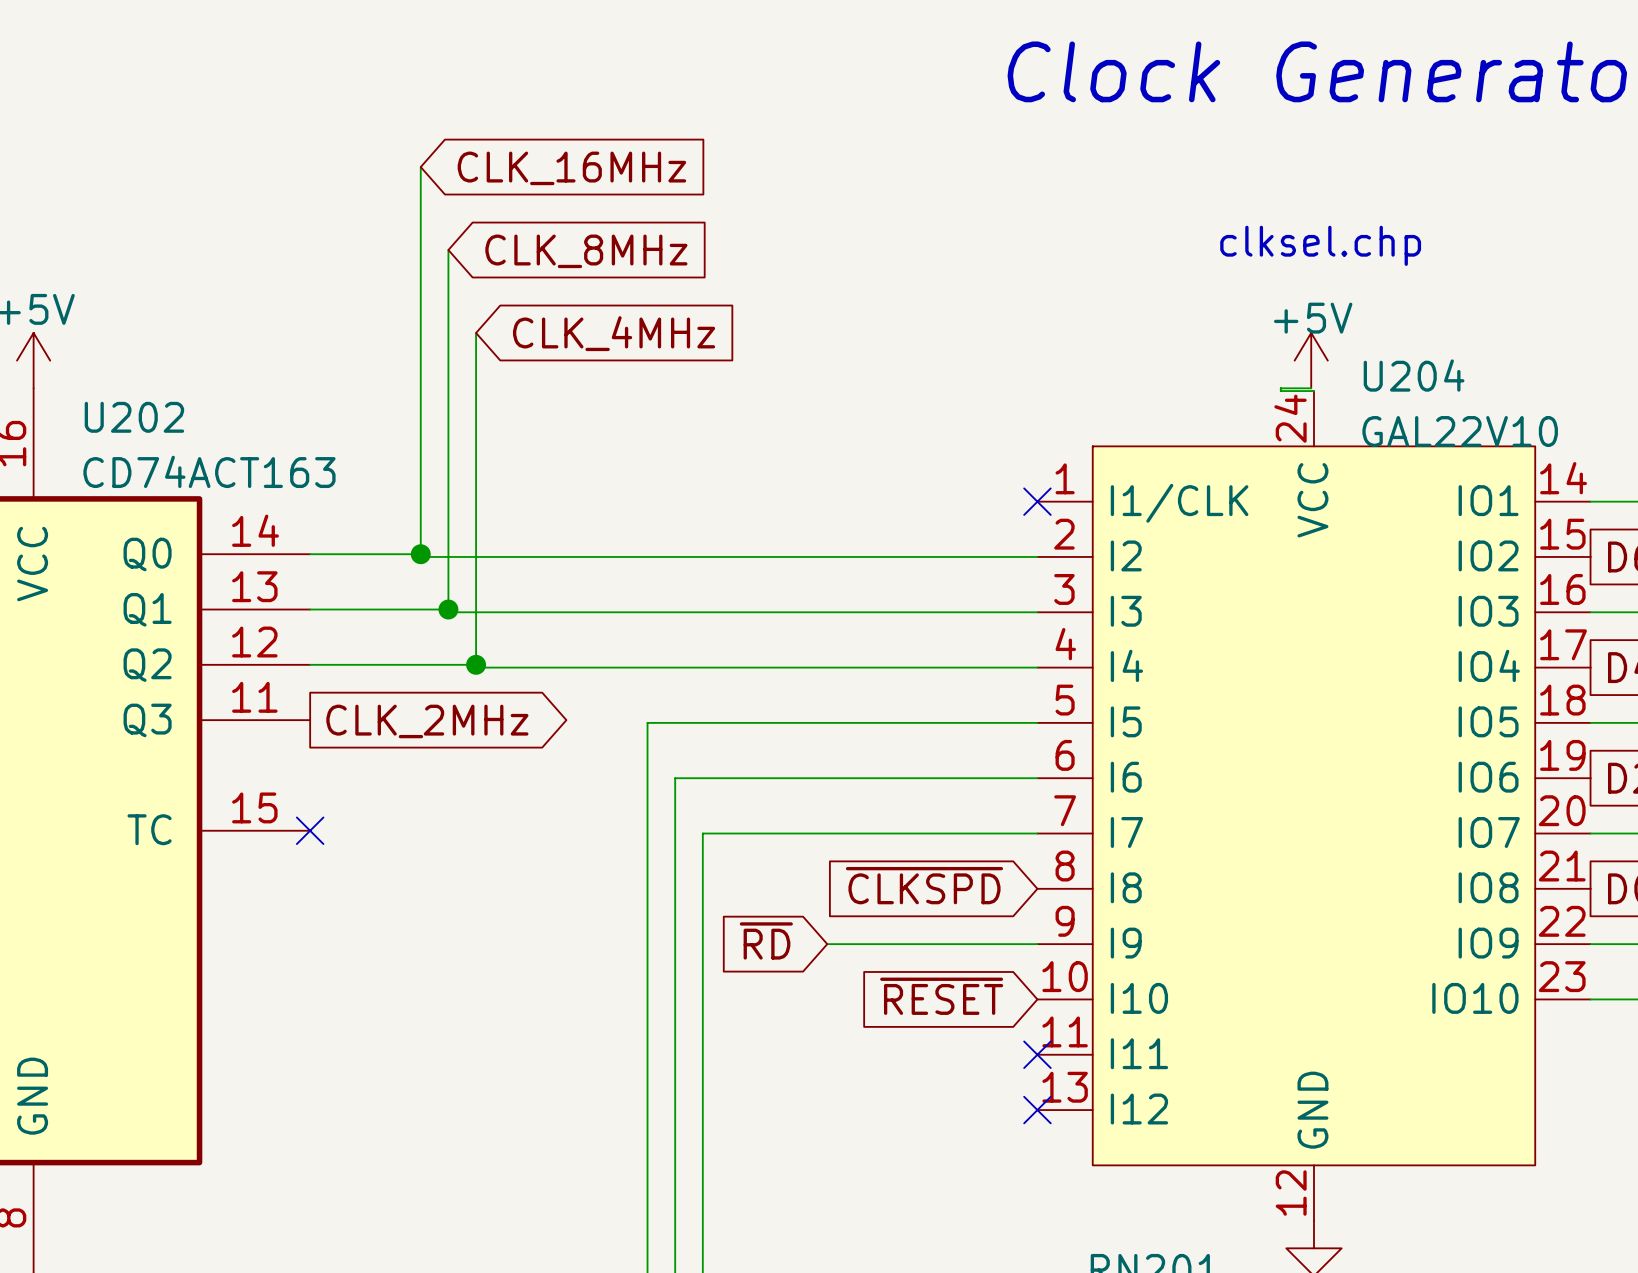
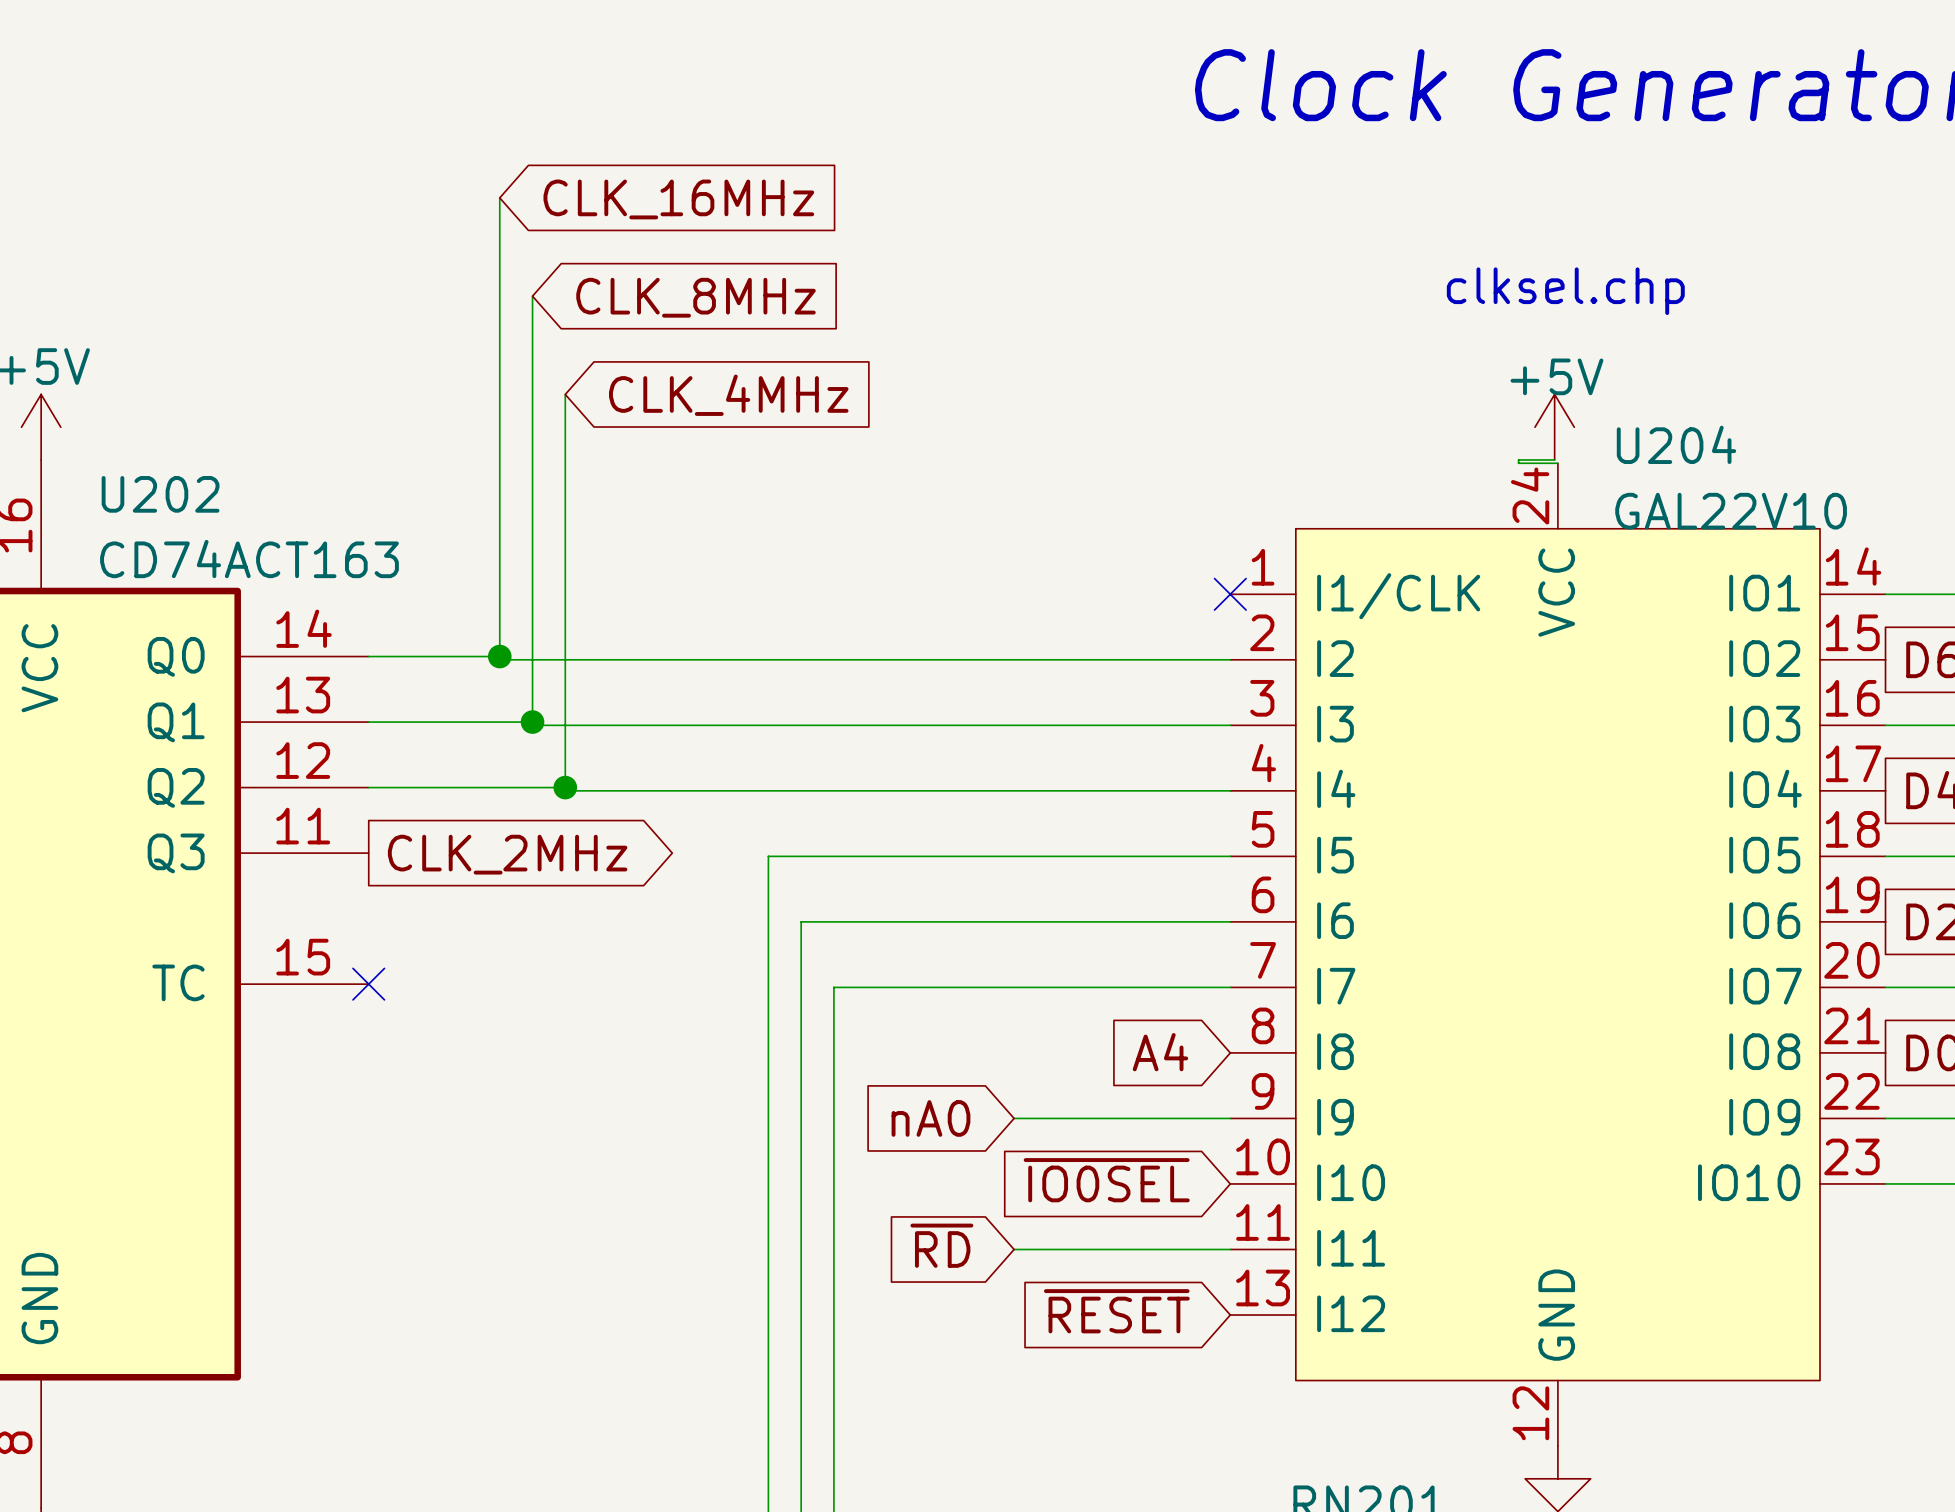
global label: ~{CLKSPD} (924, 885) -> A4 (1160, 1052)
global label position: ~{RD} (766, 940) -> ~{RD} (941, 1245)
global label: none -> nA0 (930, 1118)
wire: (827, 944) (854, 944) -> none
global label: ~{RESET} (941, 996) -> ~{IO0SEL} (1106, 1180)
wire: none -> (1014, 1249) (1230, 1249)
no-connect mark: (1037, 1054) -> none
global label: none -> ~{RESET} (1116, 1311)
no-connect mark: (1037, 1110) -> none

